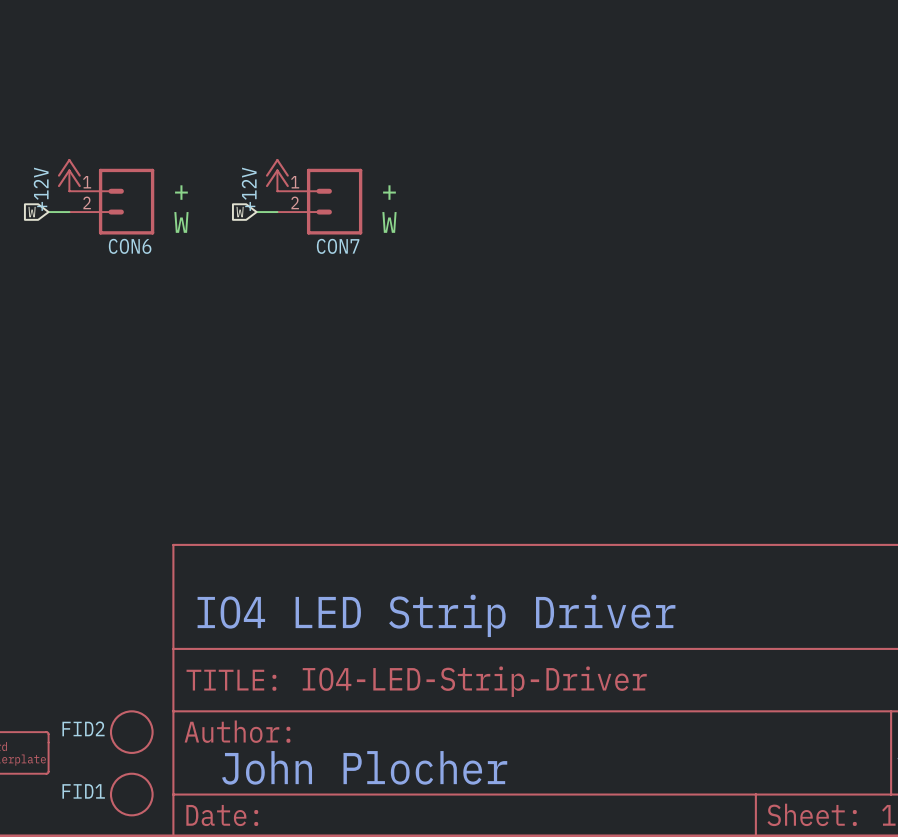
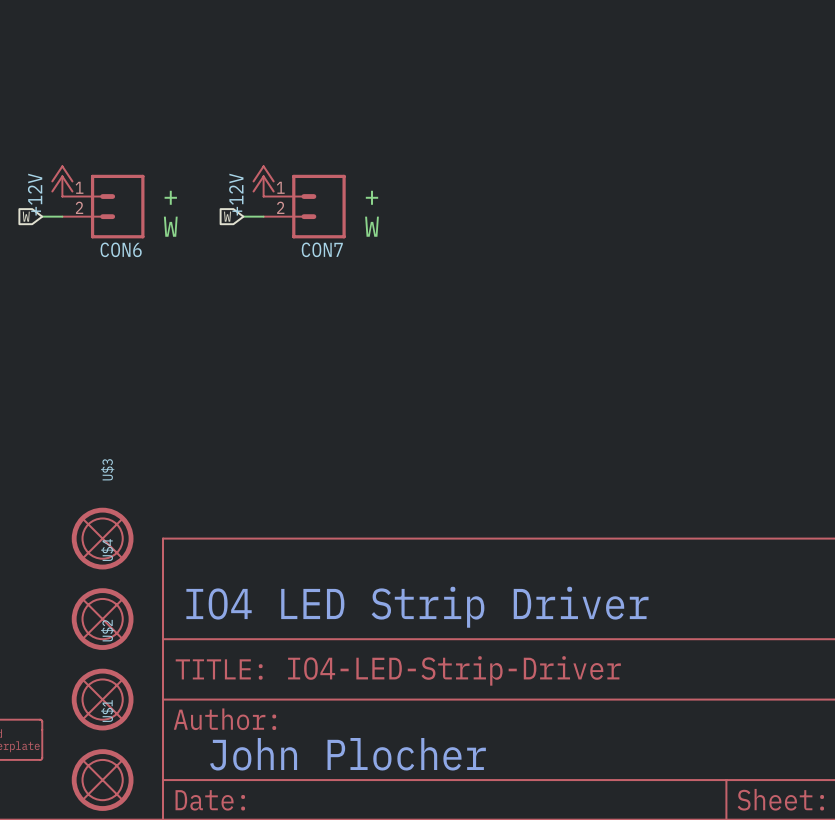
U$3: none -> (102, 538)
U$4: none -> (102, 619)
U$2: none -> (102, 699)
FID2: (131, 732) -> none
U$1: none -> (102, 780)
FID1: (131, 794) -> none

